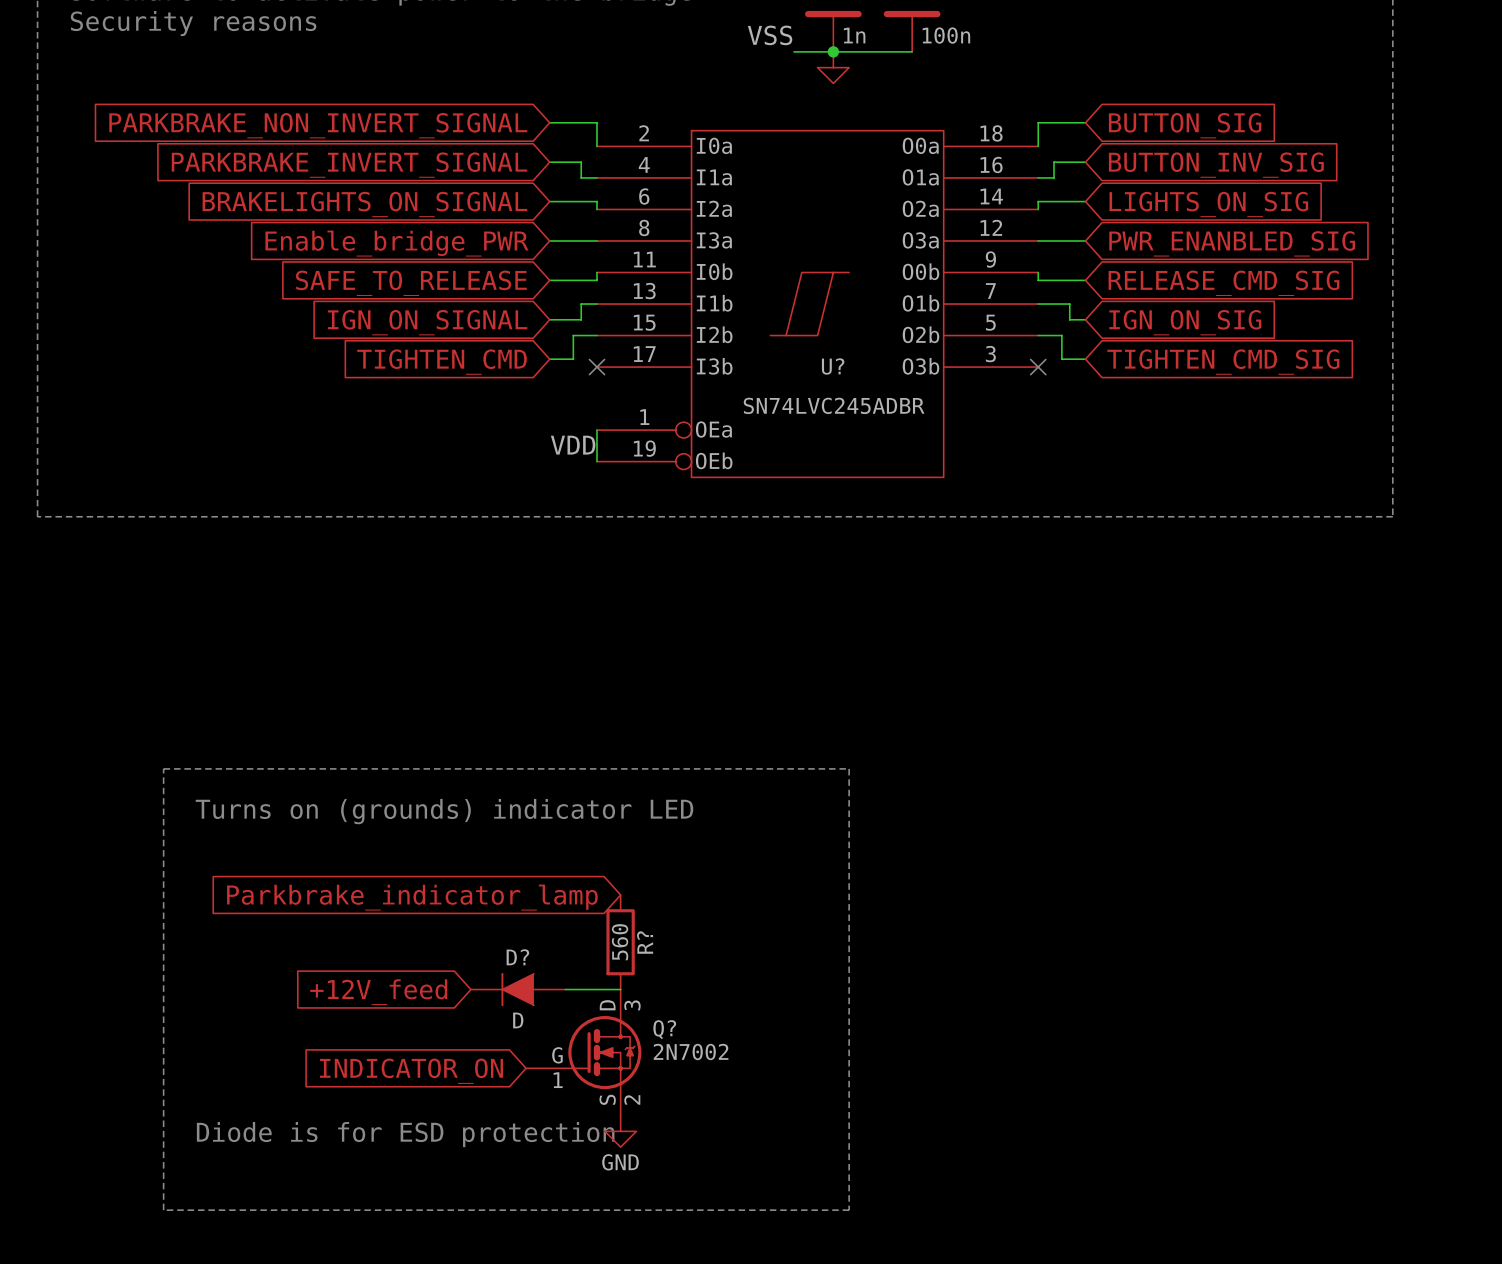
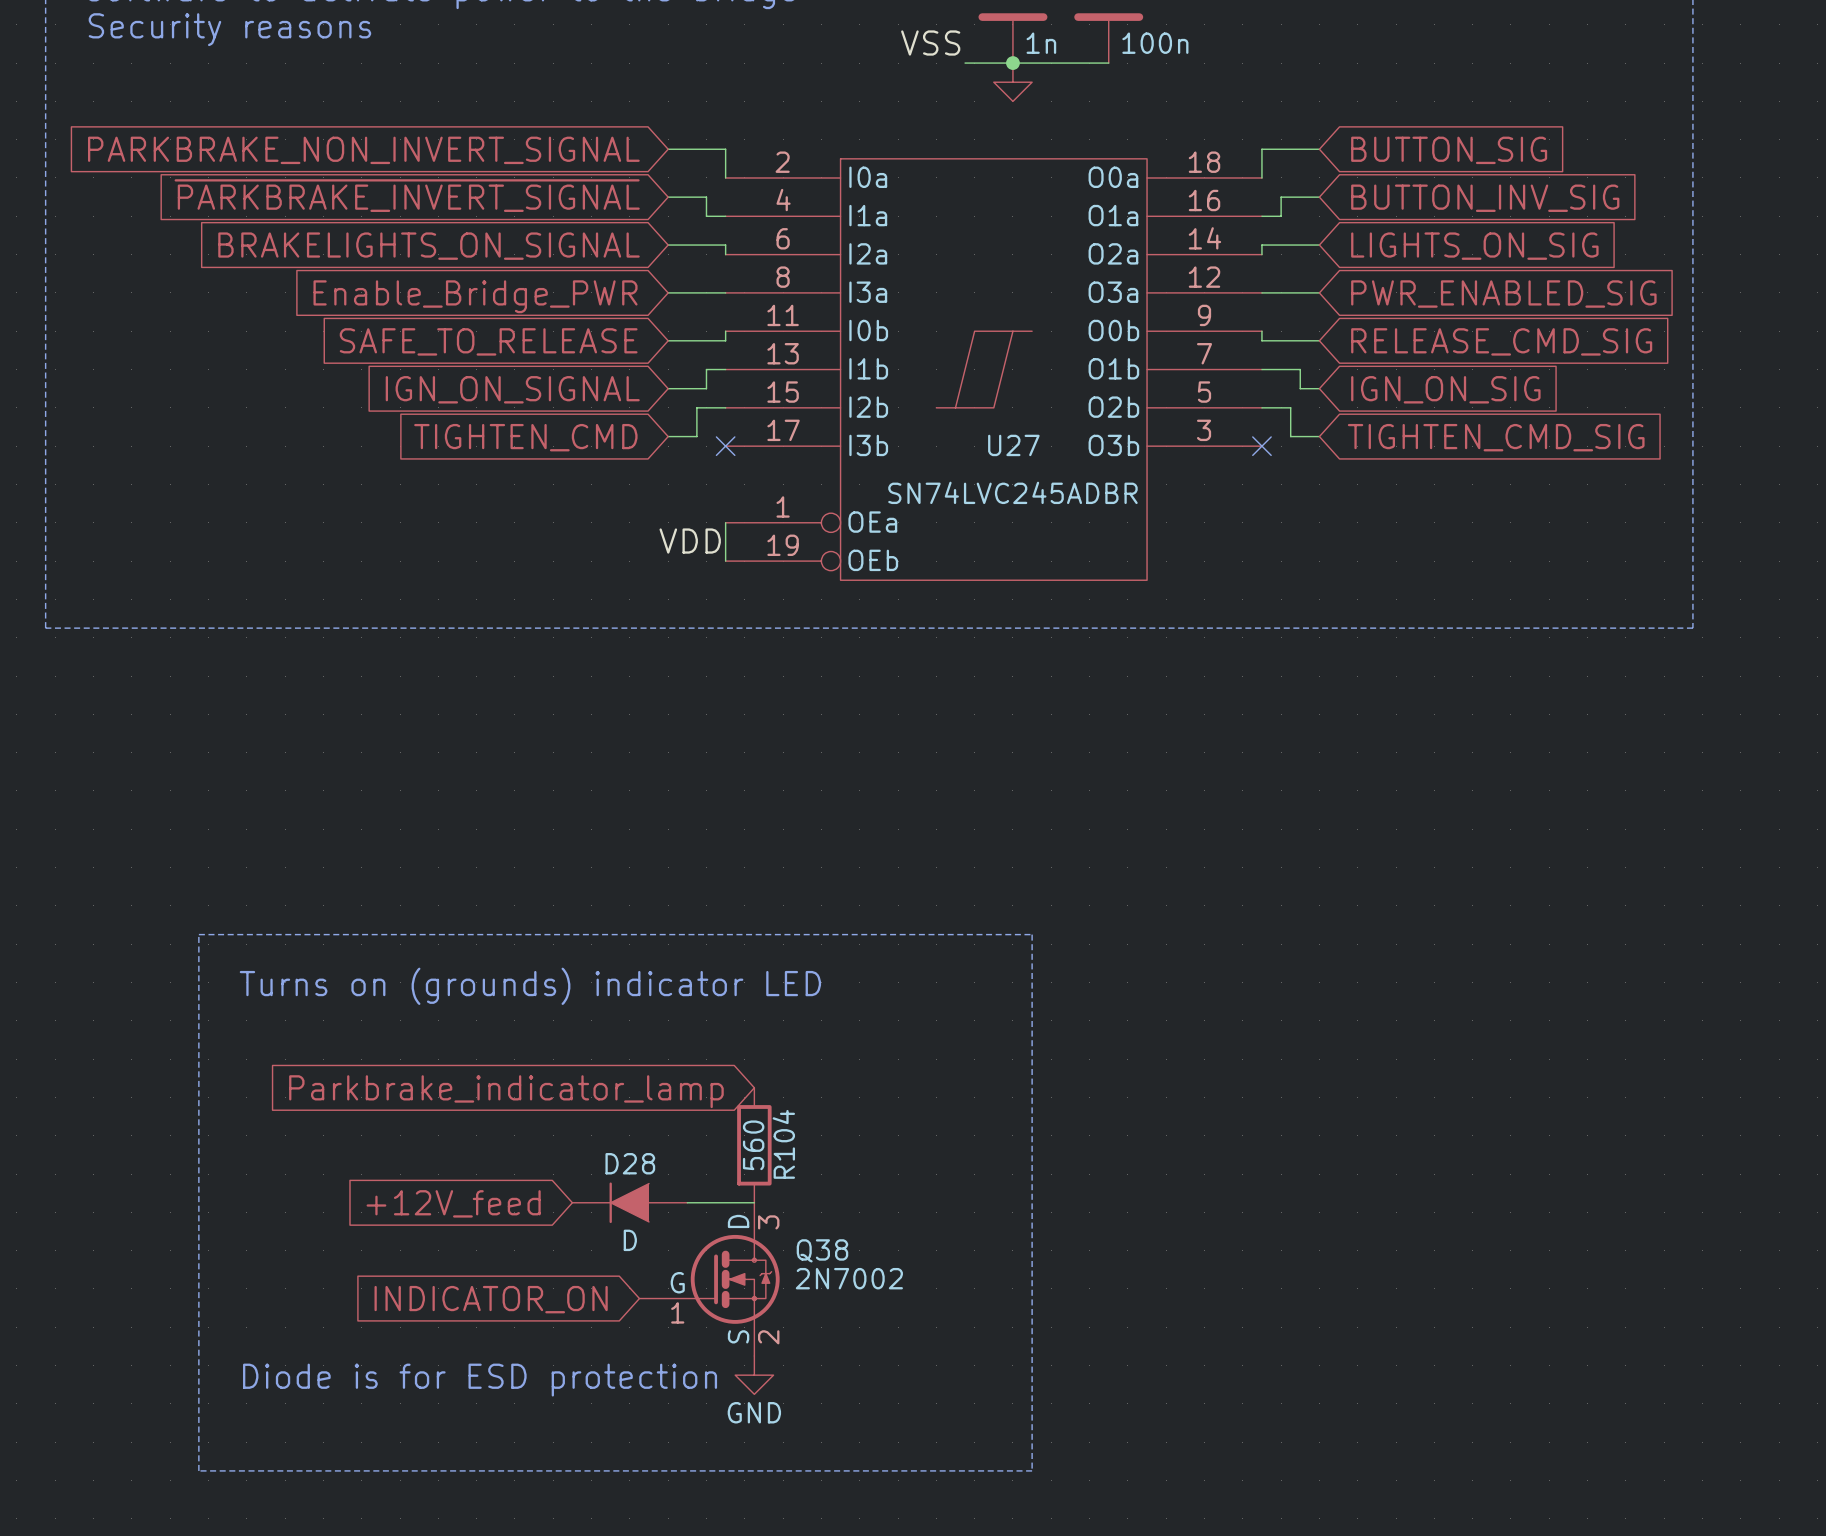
global label: PARKBRAKE_INVERT_SIGNAL (349, 165) -> ~{PARKBRAKE_INVERT_SIGNAL} (407, 195)
global label: Enable_bridge_PWR (396, 243) -> Enable_Bridge_PWR (475, 296)
global label: PWR_ENANBLED_SIG (1232, 243) -> PWR_ENABLED_SIG (1503, 294)
U? name: U? (833, 366) -> U27 (1013, 445)
R? name: R? (645, 942) -> R104 (783, 1144)
D? name: D? (517, 957) -> D28 (630, 1163)
Q? name: Q? (664, 1029) -> Q38 (822, 1250)

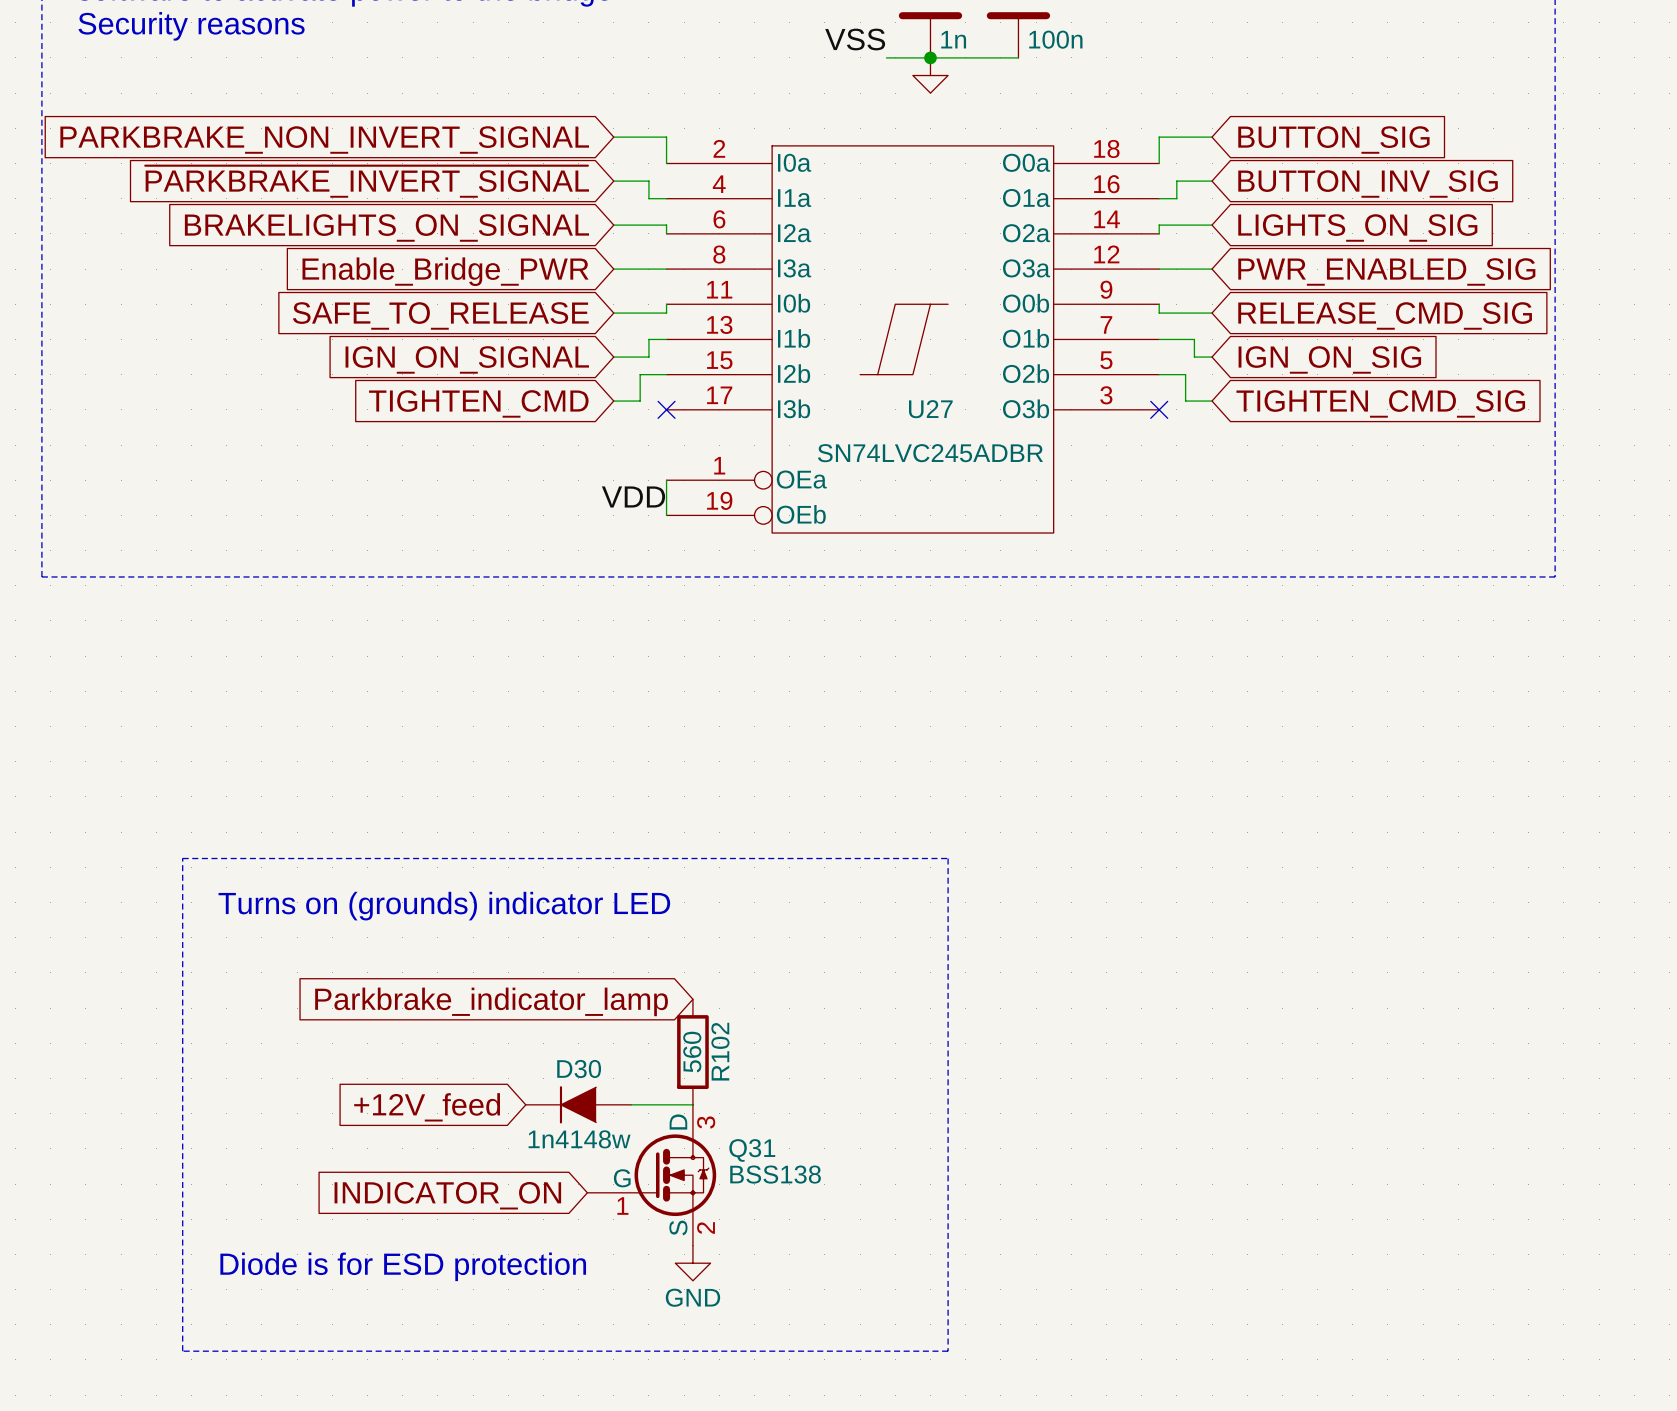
R104 name: R104 (783, 1144) -> R102 (720, 1051)
D28 name: D28 (630, 1163) -> D30 (579, 1068)
D28 value: D (630, 1240) -> 1n4148w (579, 1139)
Q38 name: Q38 (822, 1250) -> Q31 (752, 1150)
Q38 value: 2N7002 (849, 1278) -> BSS138 (775, 1174)

